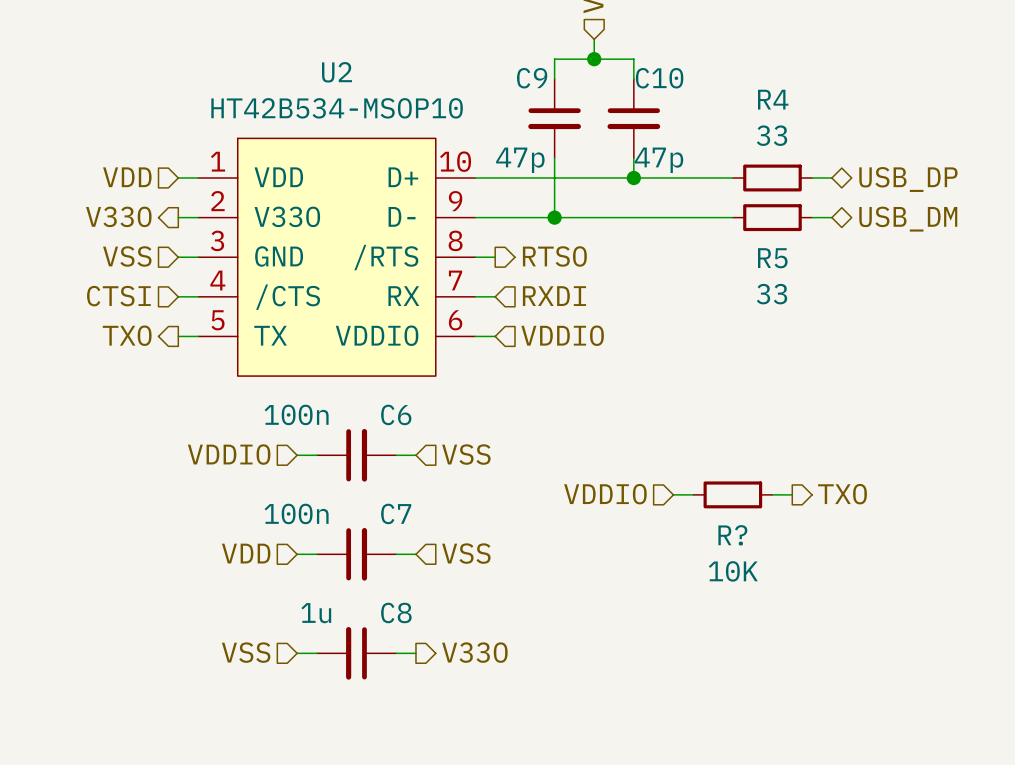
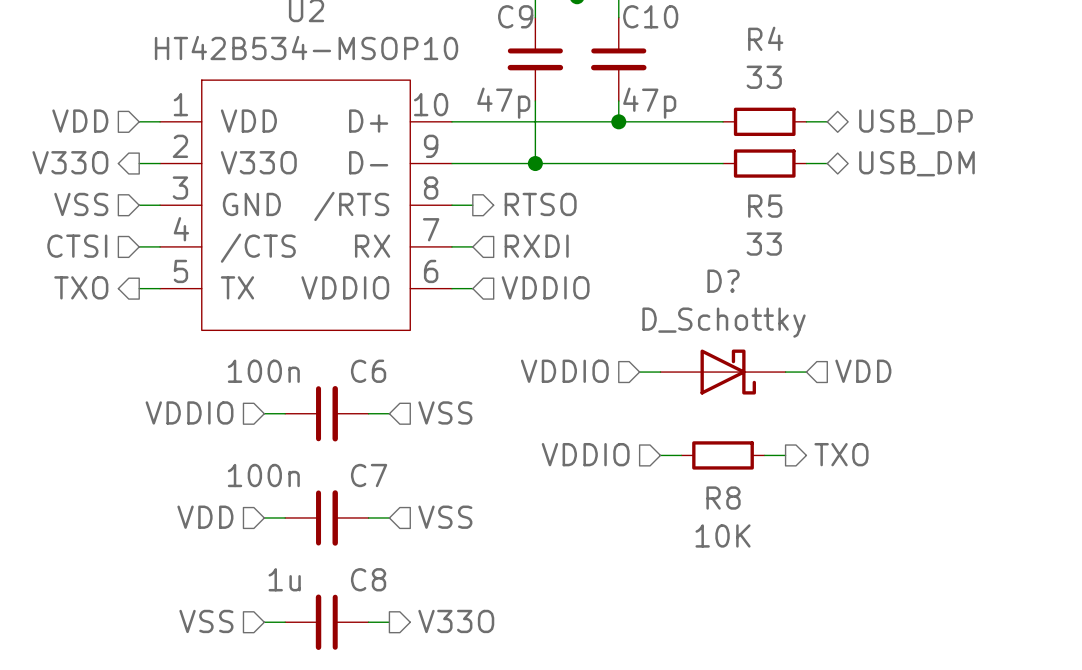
hierarchical label: none -> VDDIO (564, 371)
hierarchical label: none -> VDD (863, 371)
wire: none -> (639, 372) (660, 372)
D?: none -> D_Schottky (723, 372)
wire: none -> (785, 372) (806, 372)
R? name: R? (732, 535) -> R8 (723, 498)

